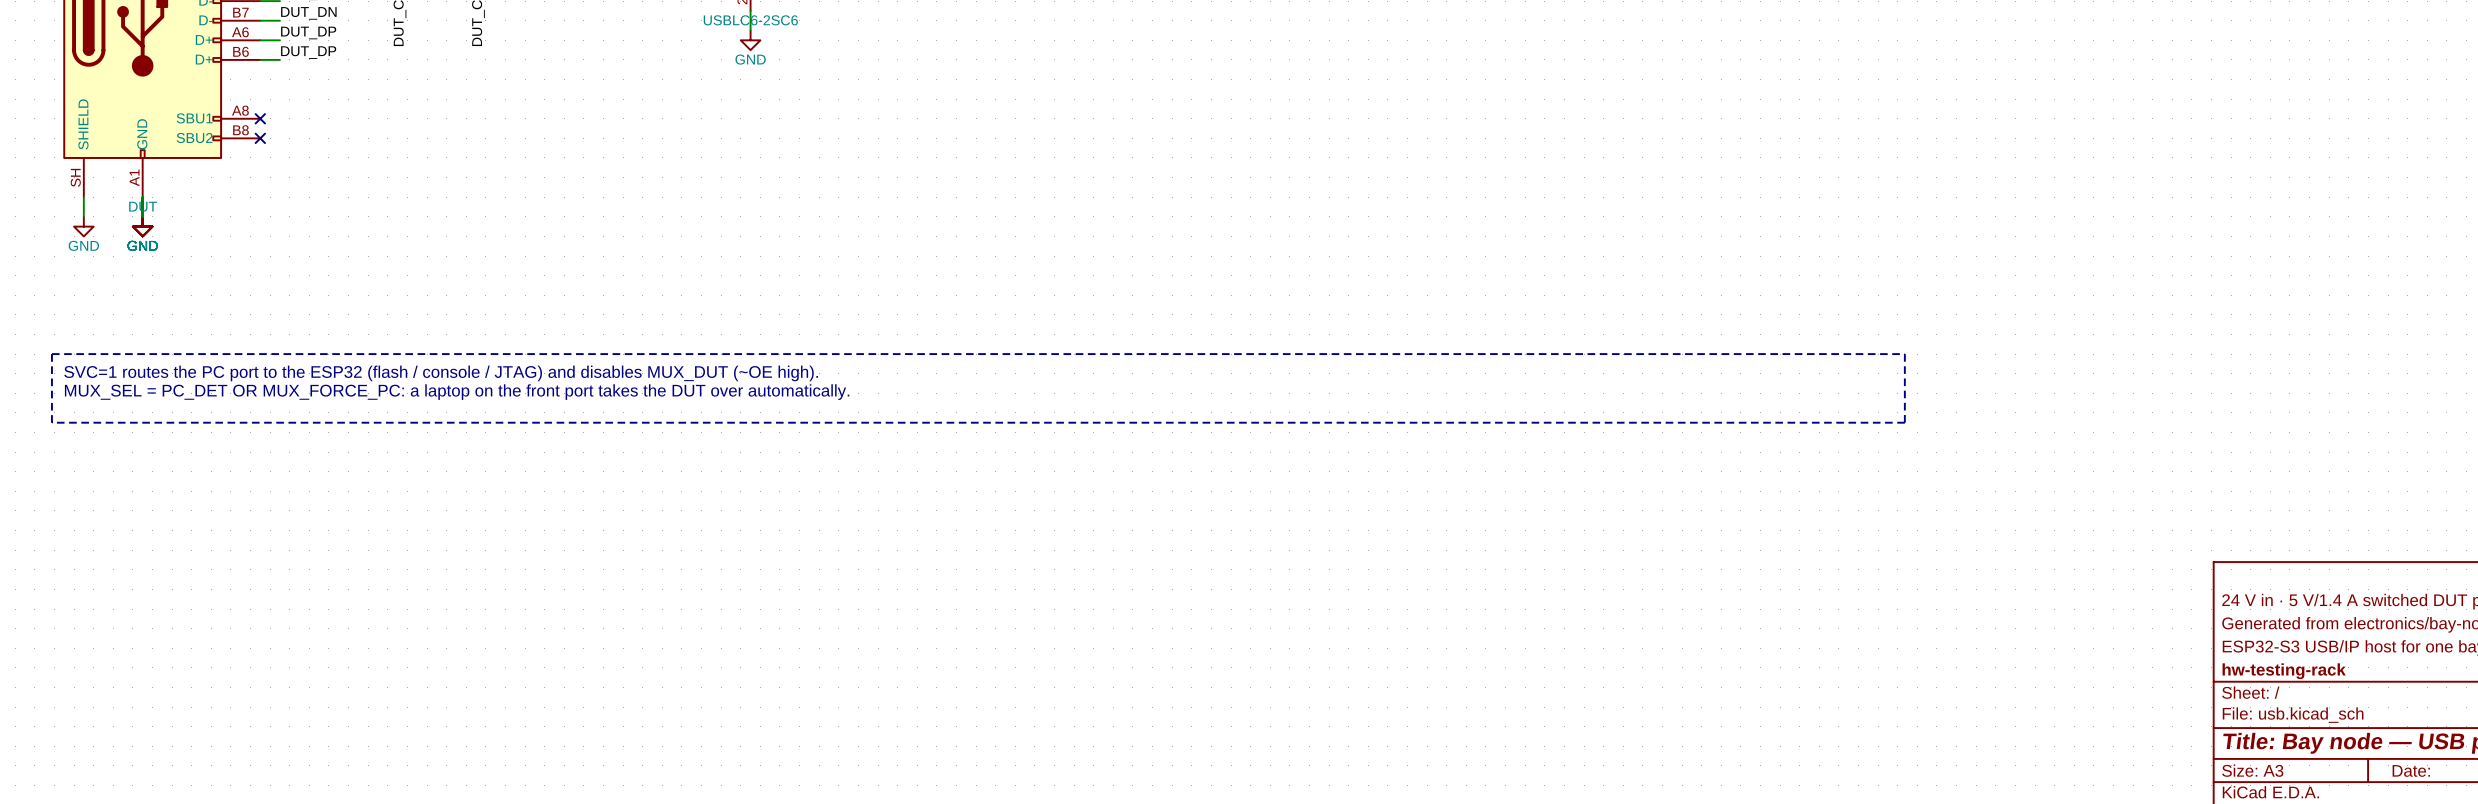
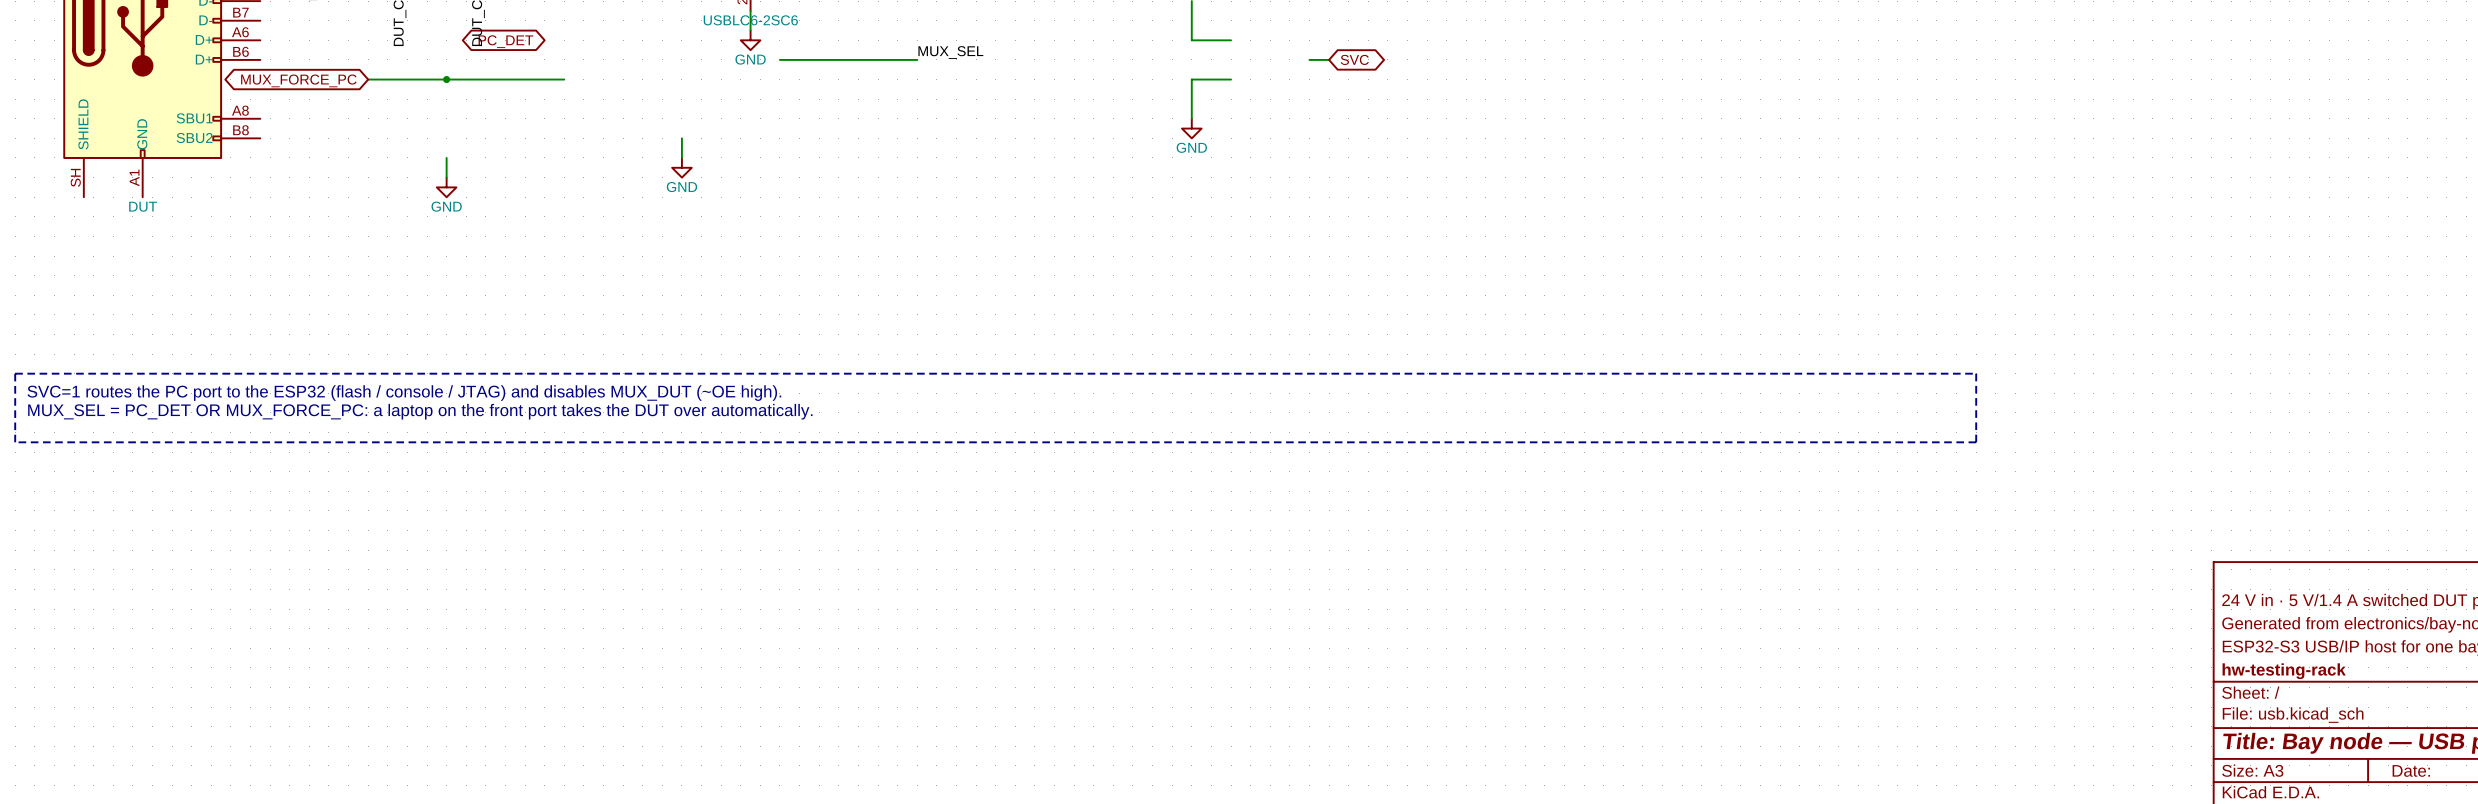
wire: (260, 1) (279, 1) -> none
wire: none -> (1191, 1) (1191, 40) (1231, 40)
label: DUT_DN (308, 13) -> none
wire: (260, 20) (279, 20) -> none
label: DUT_DP (308, 32) -> none
wire: (260, 40) (279, 40) -> none
global label: none -> PC_DET (505, 41)
label: DUT_DP (308, 52) -> none
label: none -> MUX_SEL (950, 52)
wire: (260, 59) (279, 59) -> none
wire: none -> (779, 59) (917, 59)
wire: none -> (1309, 59) (1329, 59)
global label: none -> SVC (1354, 59)
wire: none -> (368, 79) (564, 79)
junction: none -> (446, 79)
wire: none -> (1231, 79) (1191, 79) (1191, 118)
global label: none -> MUX_FORCE_PC (298, 80)
no-connect mark: (260, 118) -> none
power symbol: none -> GND (1191, 128)
no-connect mark: (260, 138) -> none
wire: none -> (681, 138) (681, 157)
wire: none -> (446, 157) (446, 177)
power symbol: none -> GND (681, 167)
power symbol: none -> GND (446, 187)
wire: (83, 197) (83, 216) -> none
wire: (142, 197) (142, 216) -> none
power symbol: GND (83, 226) -> none
power symbol: GND (142, 226) -> none
line: (51, 354) (1904, 354) (1904, 422) (51, 422) (51, 354) -> (15, 373) (15, 442) (1976, 442) (1976, 373) (15, 373)
text position: SVC=1 routes the PC port to the ESP32 (flash / console / JTAG) and disables MUX_DUT (~OE high). (441, 373) -> SVC=1 routes the PC port to the ESP32 (flash / console / JTAG) and disables MUX_DUT (~OE high). (404, 393)
text position: MUX_SEL = PC_DET OR MUX_FORCE_PC: a laptop on the front port takes the DUT over automatically. (457, 392) -> MUX_SEL = PC_DET OR MUX_FORCE_PC: a laptop on the front port takes the DUT over automatically. (420, 411)

